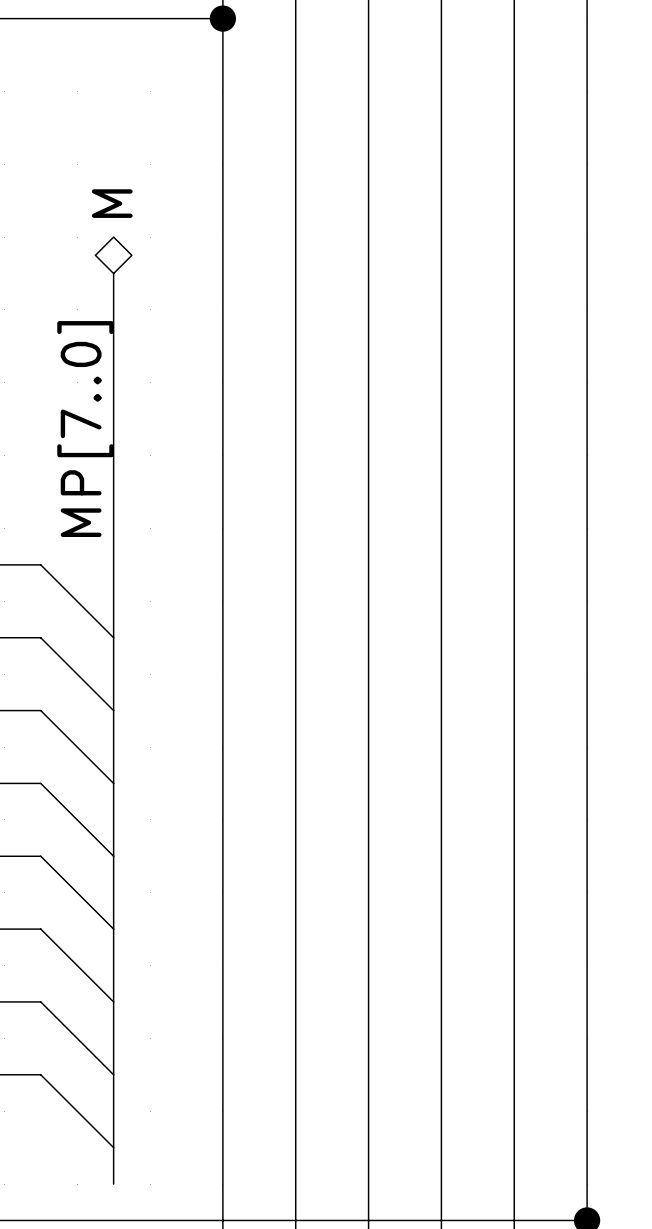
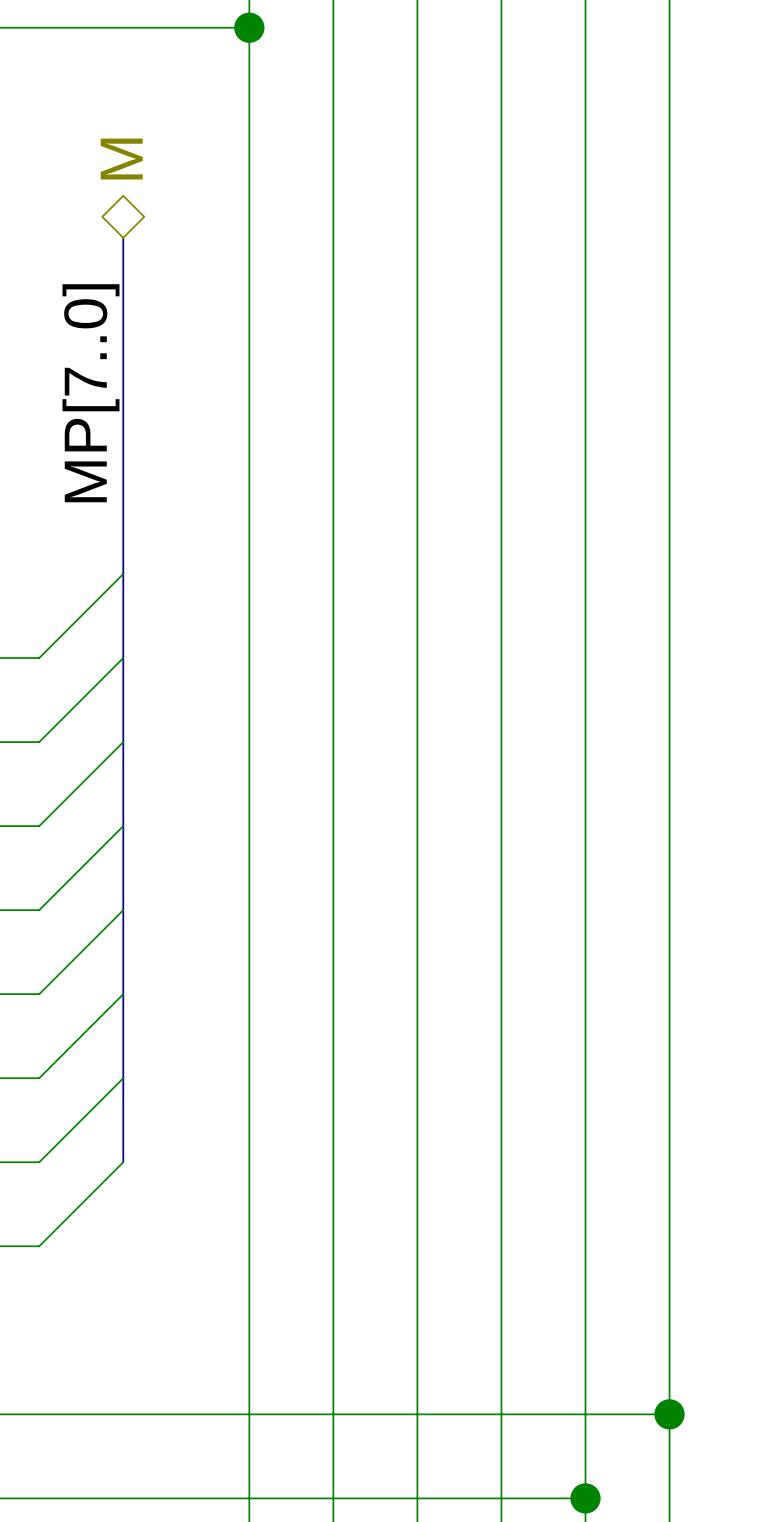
bus: none -> (123, 237) (123, 321)
hierarchical label position: M (112, 203) -> M (121, 159)
label position: MP[7..0] (85, 429) -> MP[7..0] (91, 393)
wire: (40, 564) (113, 637) -> (39, 658) (123, 573)
wire: (40, 637) (113, 710) -> (39, 742) (123, 658)
wire: (40, 710) (113, 783) -> (39, 826) (123, 742)
wire: (40, 783) (113, 856) -> (39, 910) (123, 826)
wire: (40, 856) (113, 929) -> (39, 994) (123, 910)
wire: (40, 929) (113, 1001) -> (39, 1078) (123, 994)
wire: (40, 1001) (113, 1074) -> (39, 1162) (123, 1078)
bus: (113, 1001) (113, 1184) -> none
wire: (40, 1074) (113, 1147) -> (39, 1246) (123, 1162)

